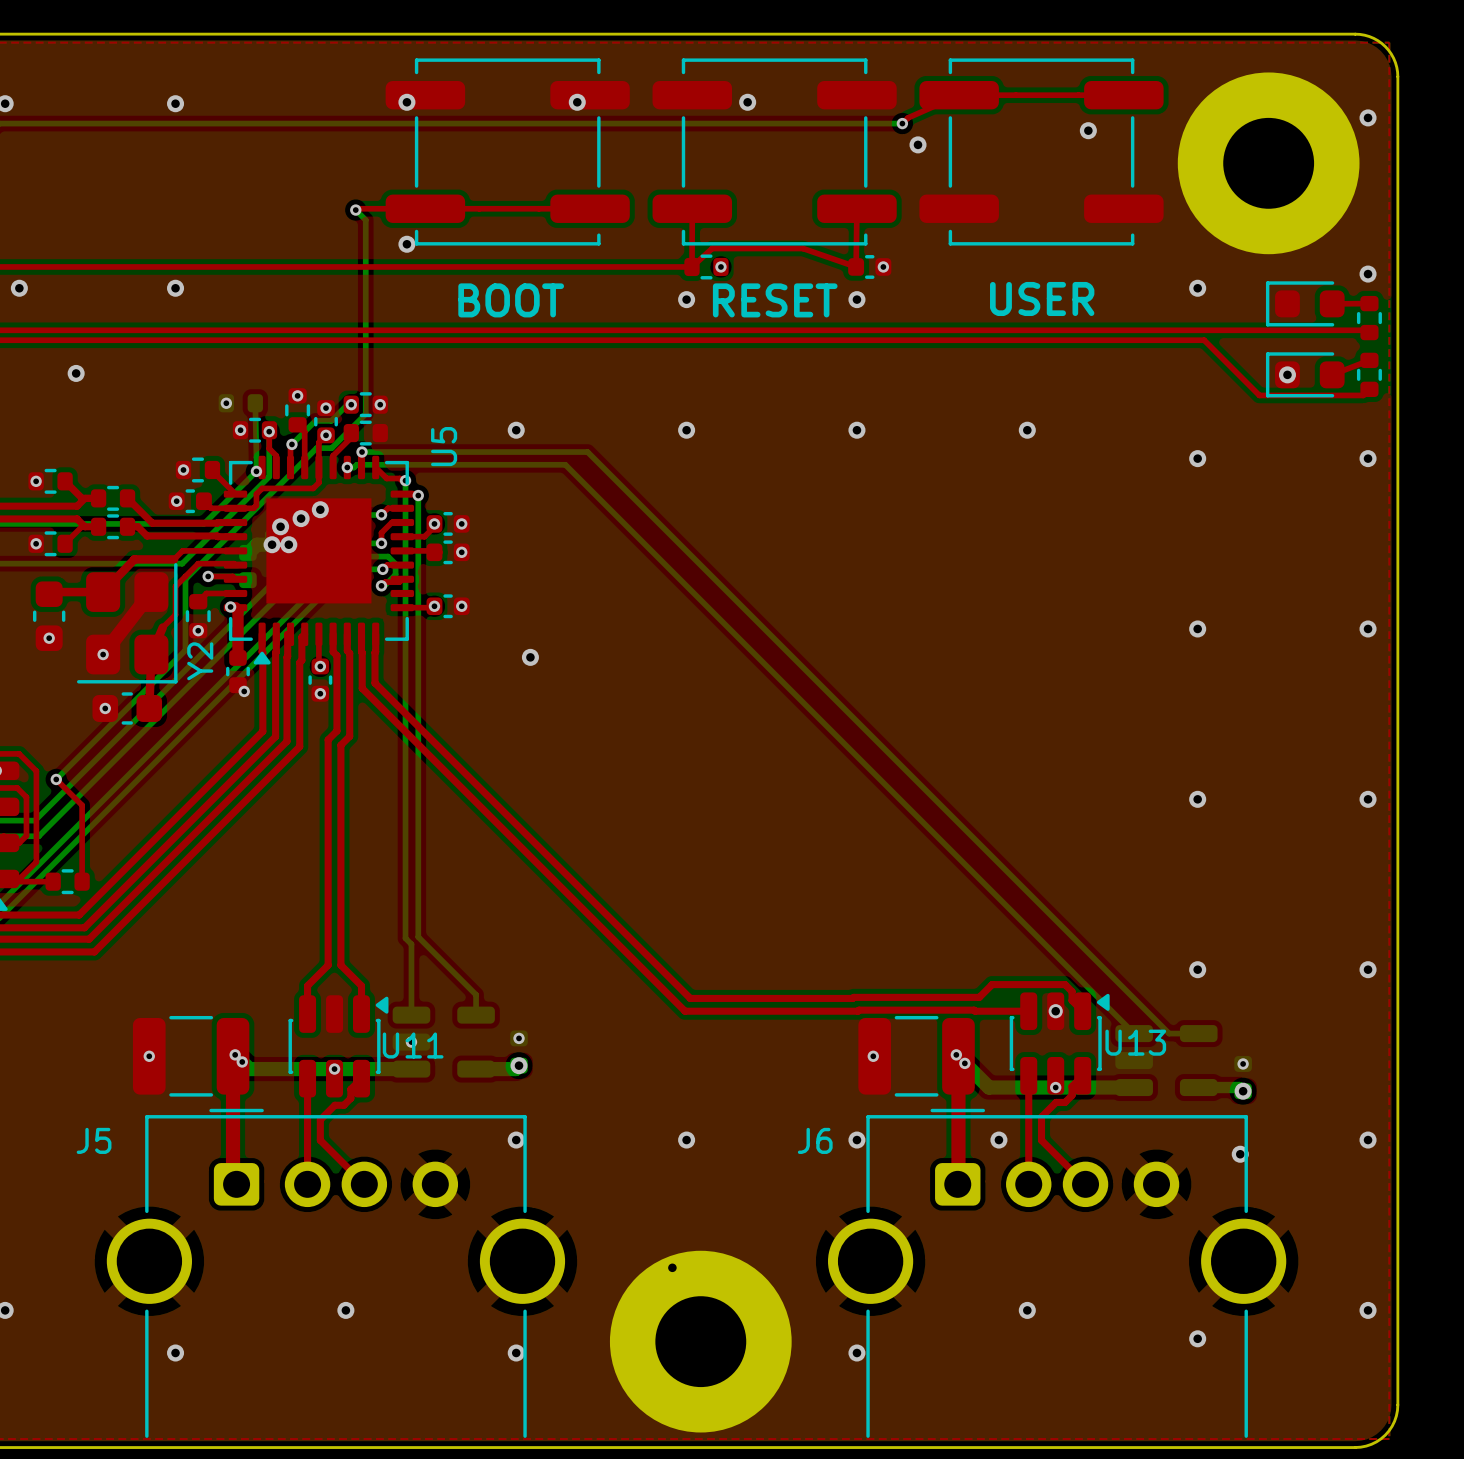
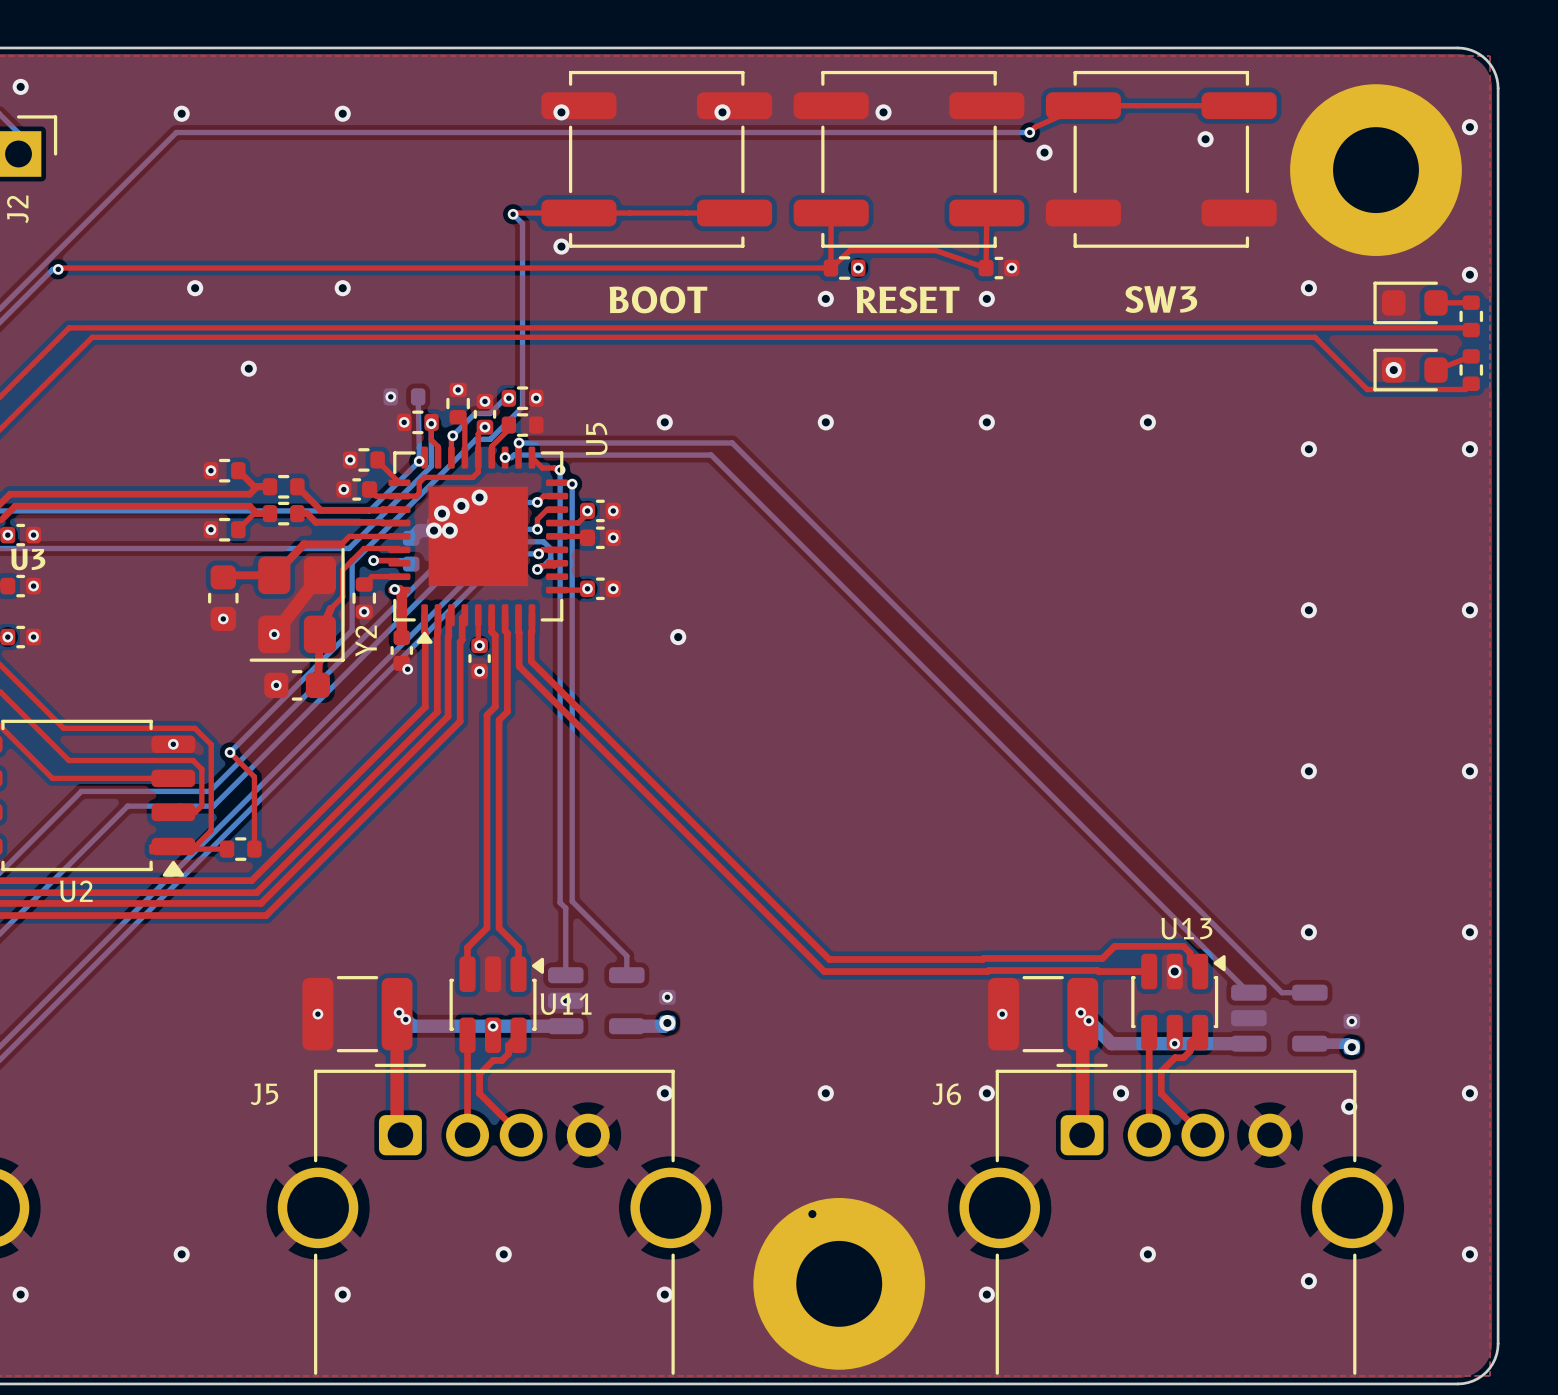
SW3 text: USER (1042, 298) -> none
SW3 name: none -> SW3 (1161, 299)
U13 name position: U13 (1135, 1042) -> U13 (1186, 928)

